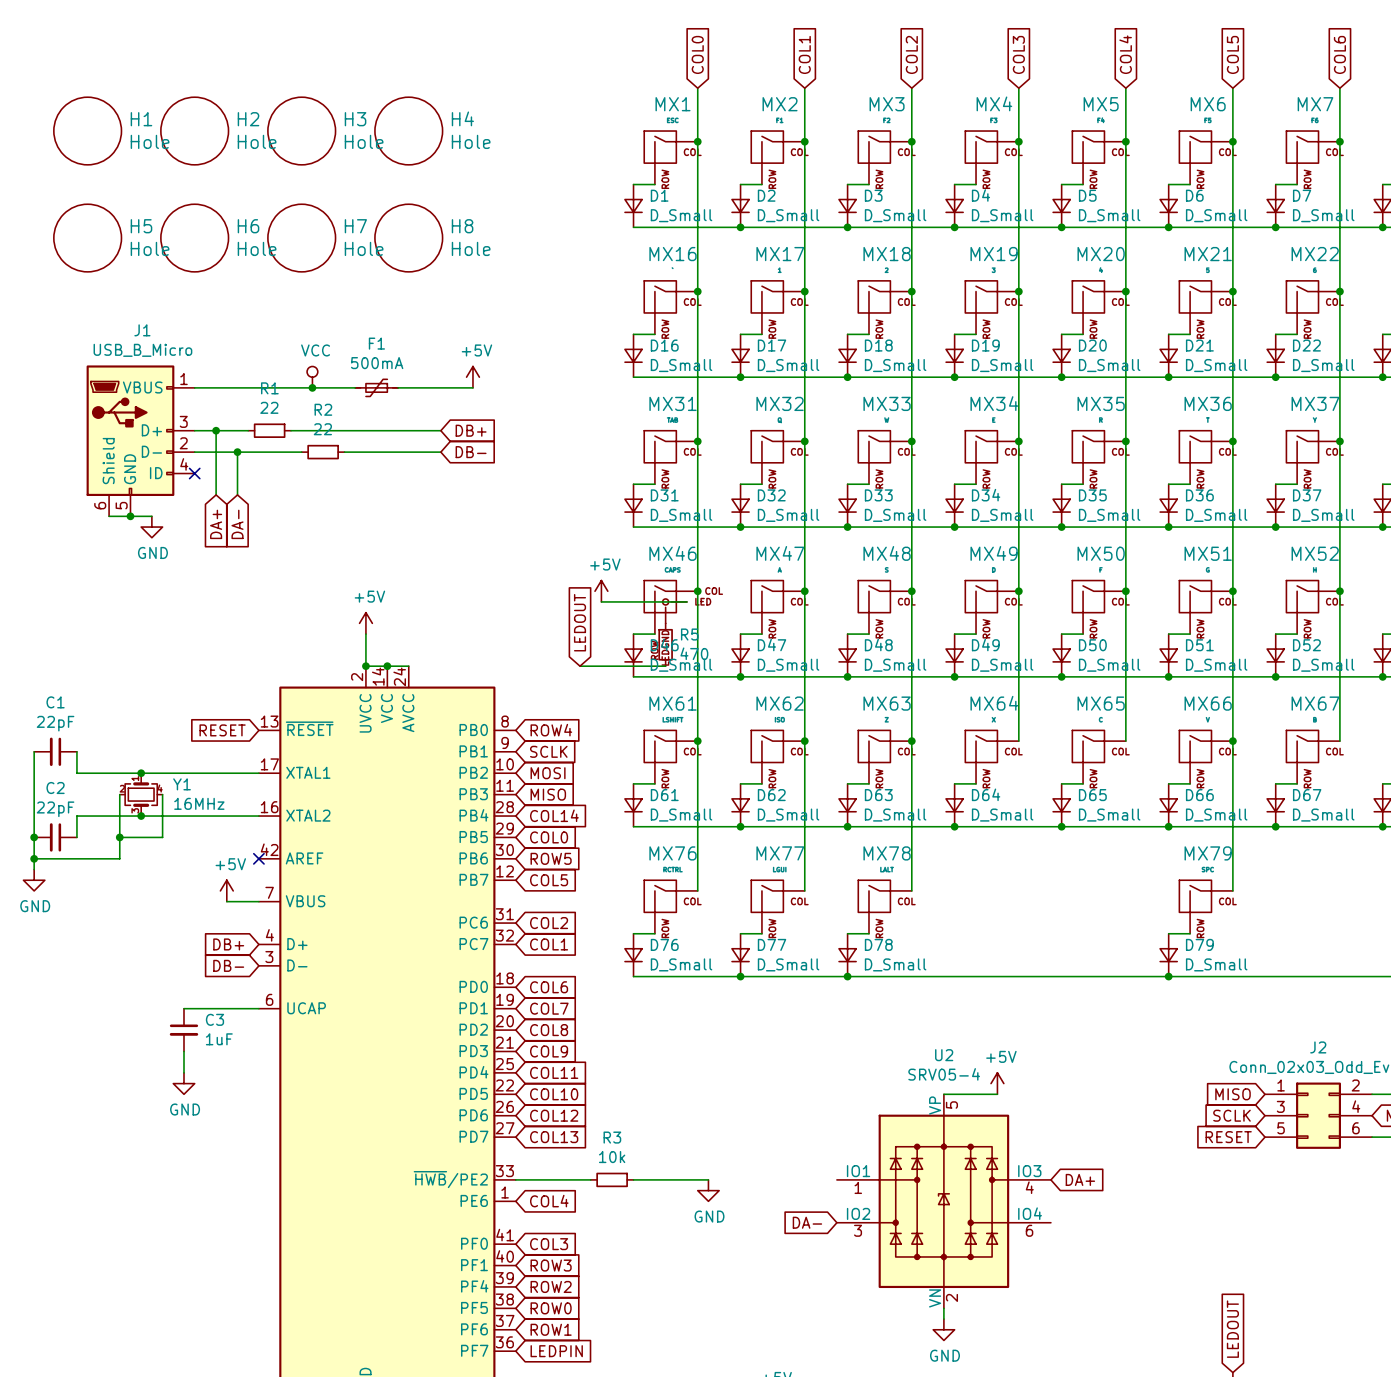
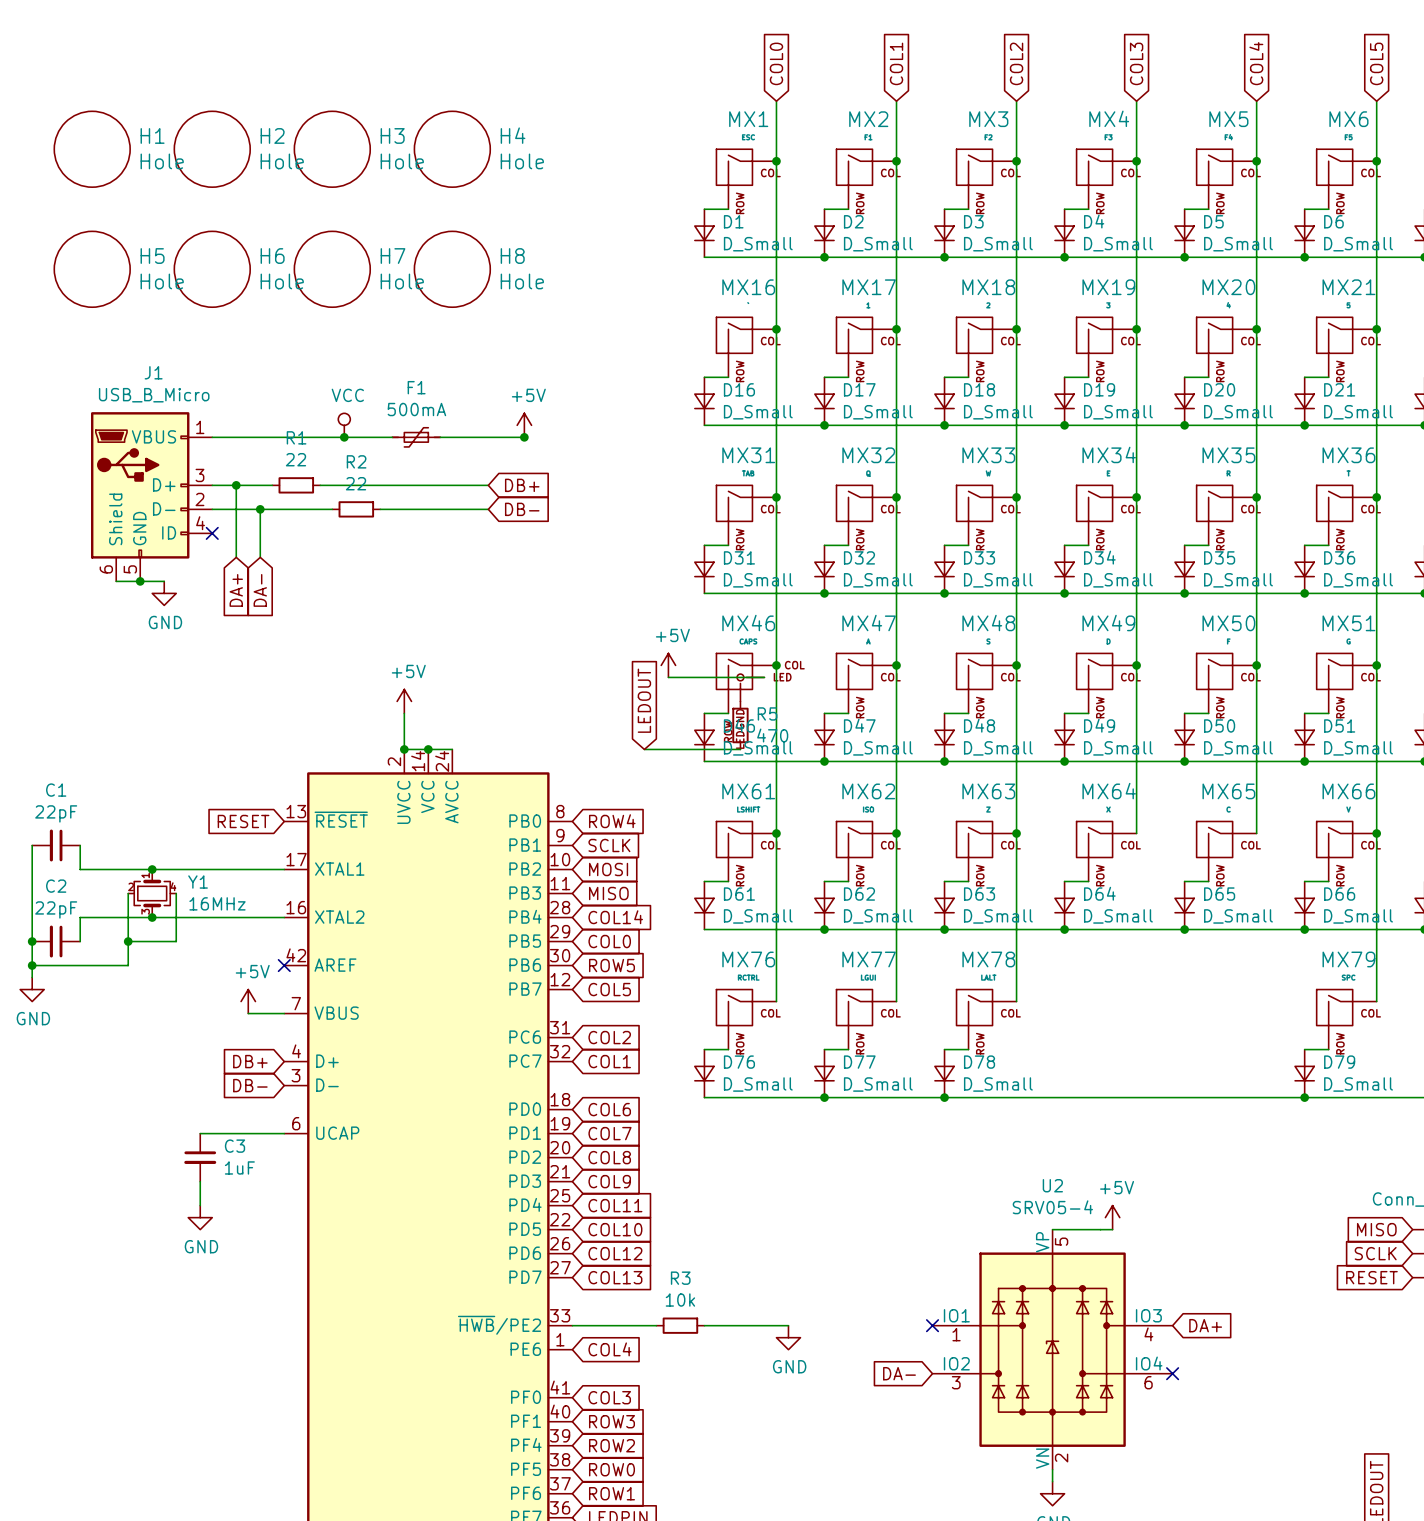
junction: none -> (524, 437)
no-connect mark: none -> (932, 1325)
no-connect mark: none -> (1172, 1373)

